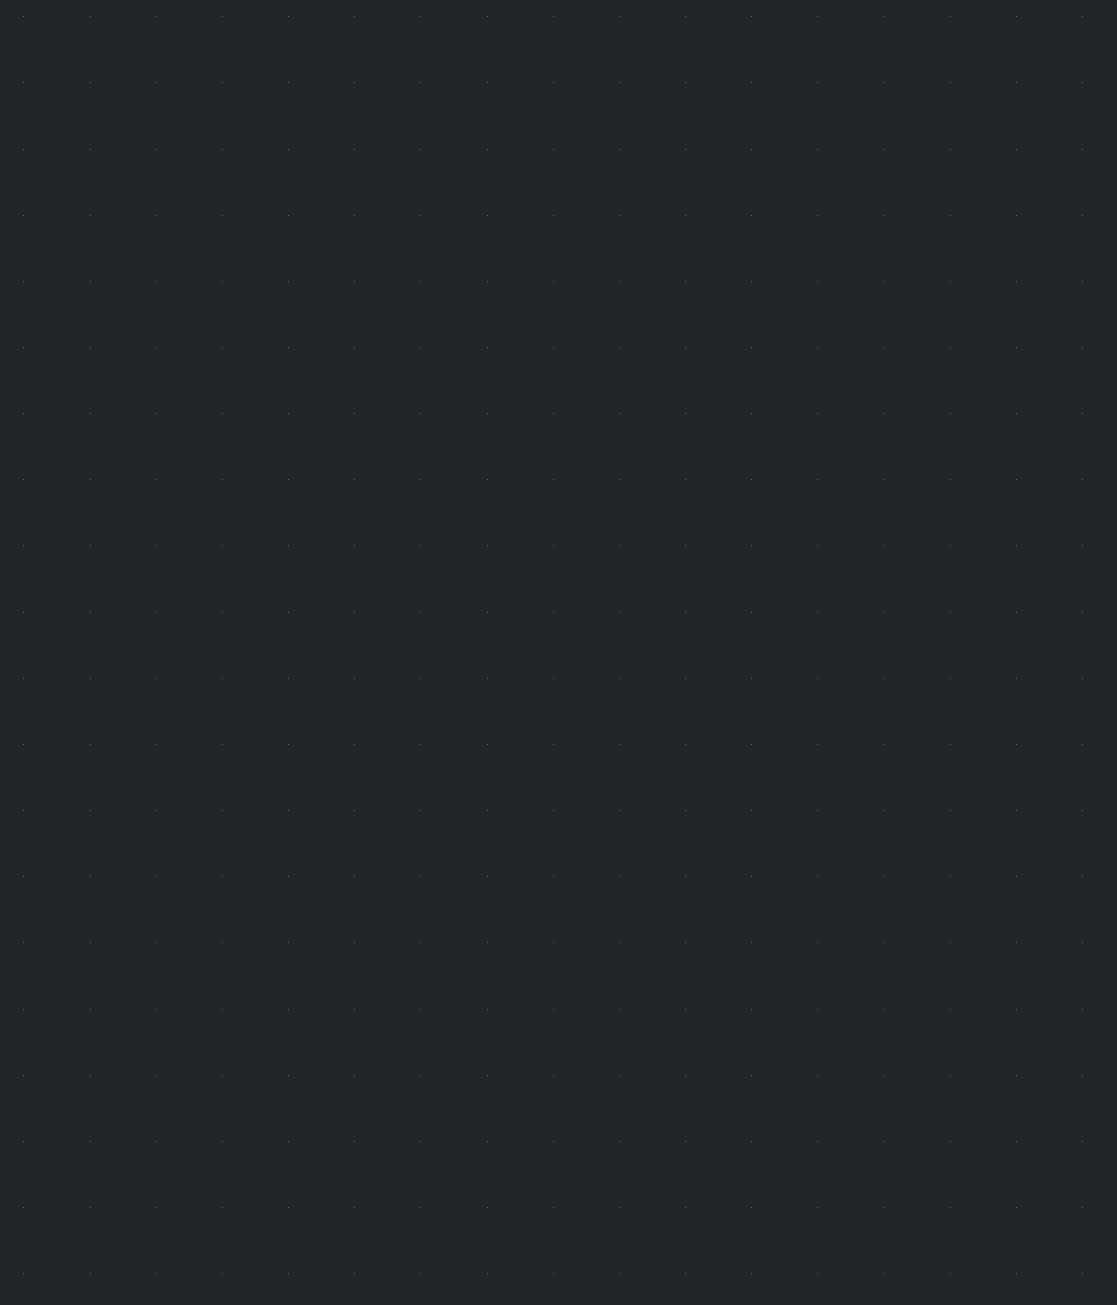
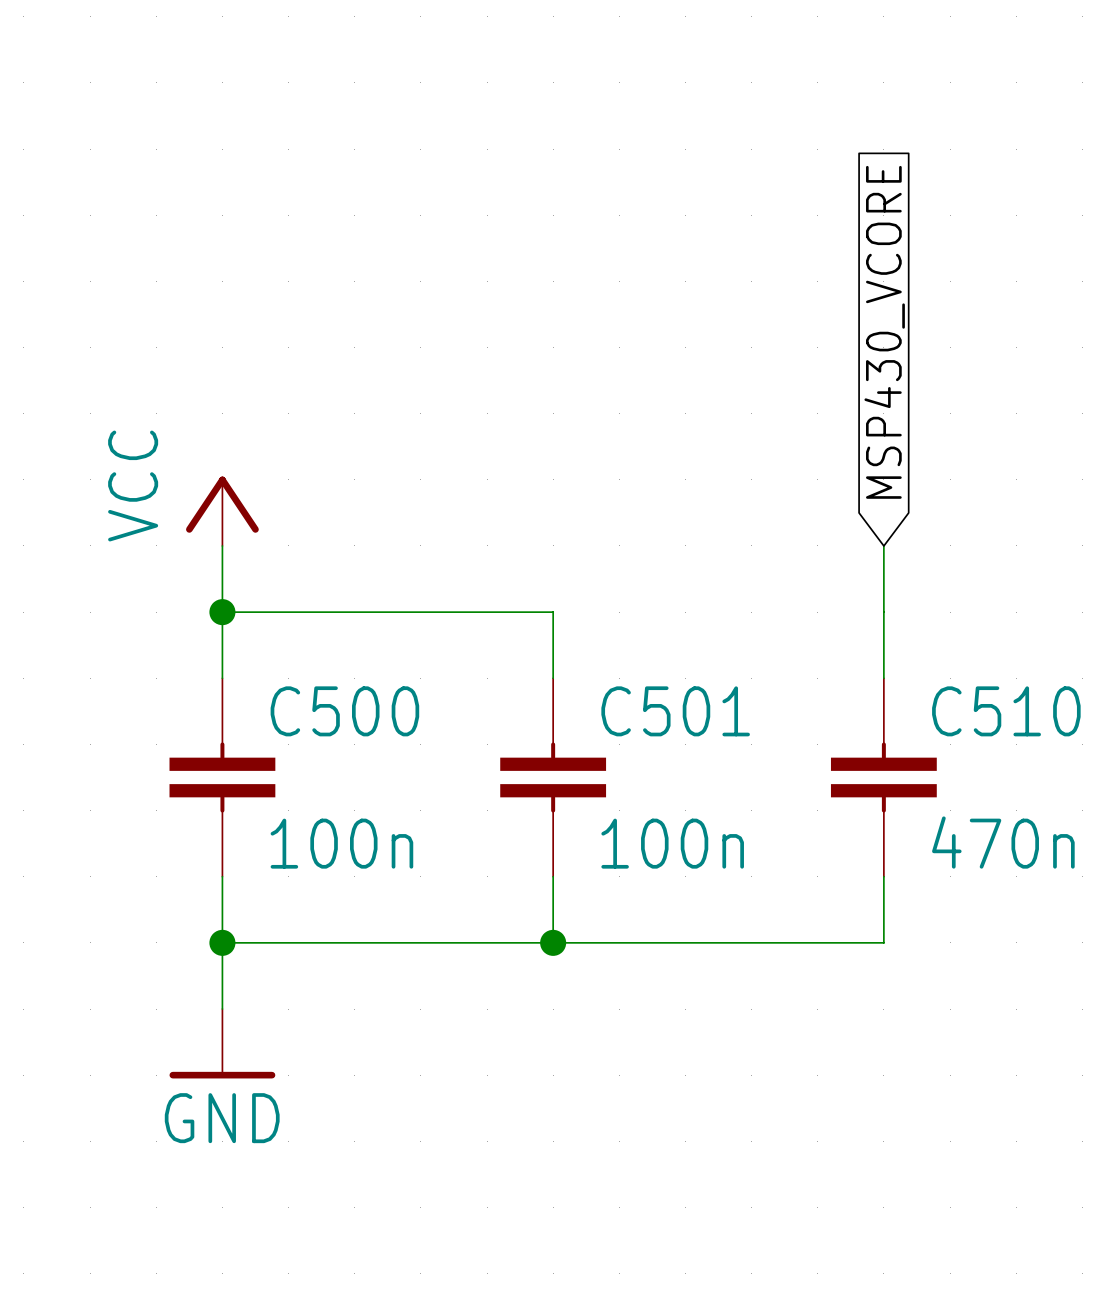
global label: none -> MSP430_VCORE (884, 332)
power symbol: none -> VCC (222, 511)
wire: none -> (222, 545) (222, 678)
wire: none -> (883, 545) (883, 678)
wire: none -> (222, 612) (553, 612) (553, 678)
junction: none -> (222, 612)
C500: none -> 100n (222, 777)
C501: none -> 100n (553, 777)
C510: none -> 470n (883, 777)
wire: none -> (222, 876) (222, 1009)
wire: none -> (553, 876) (553, 942)
wire: none -> (883, 876) (883, 942) (222, 942)
junction: none -> (222, 942)
junction: none -> (553, 942)
power symbol: none -> GND (222, 1043)

